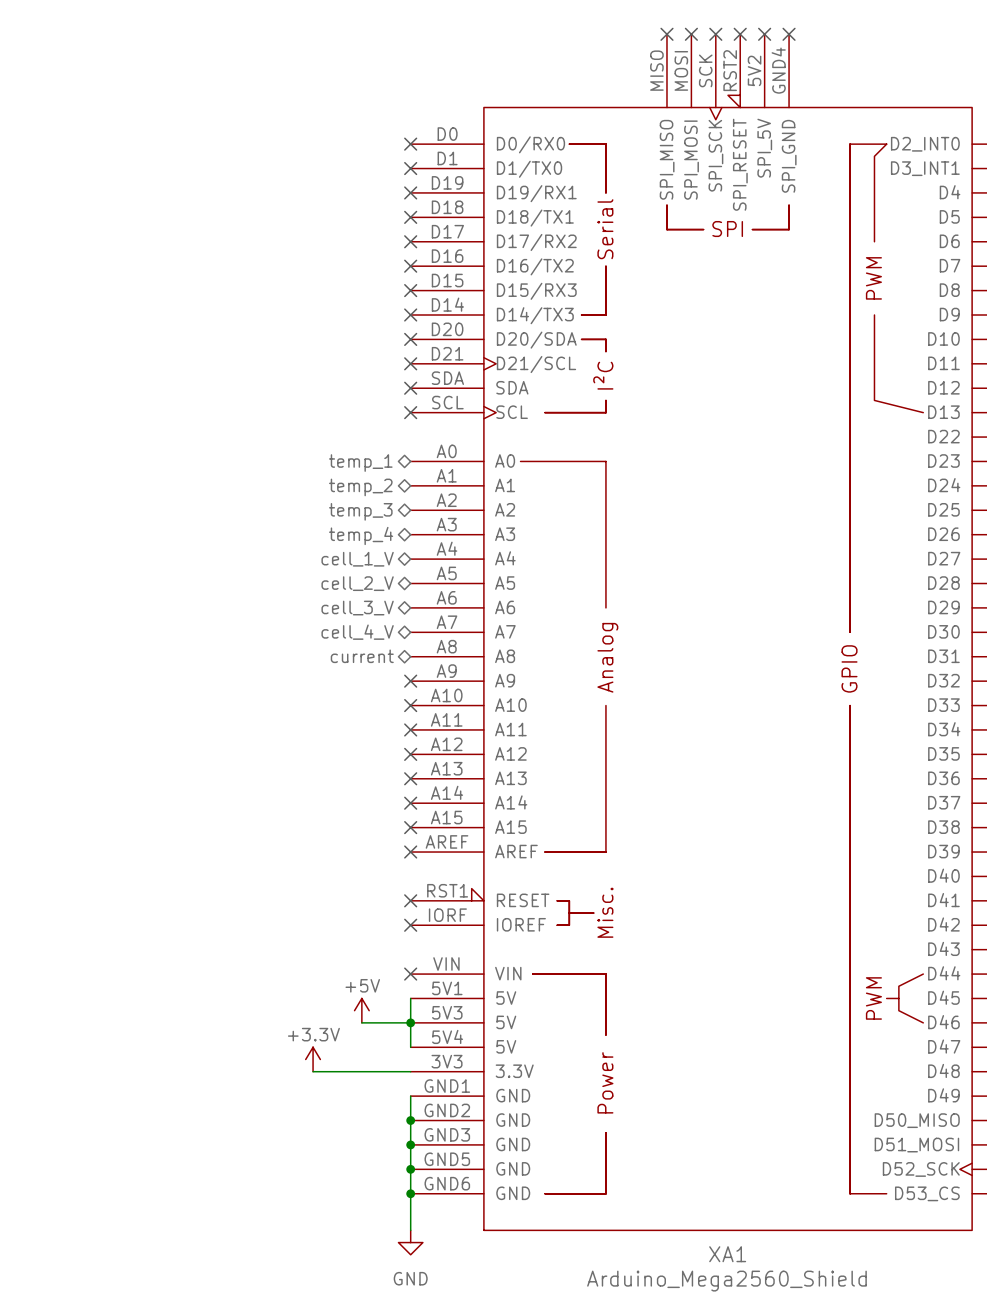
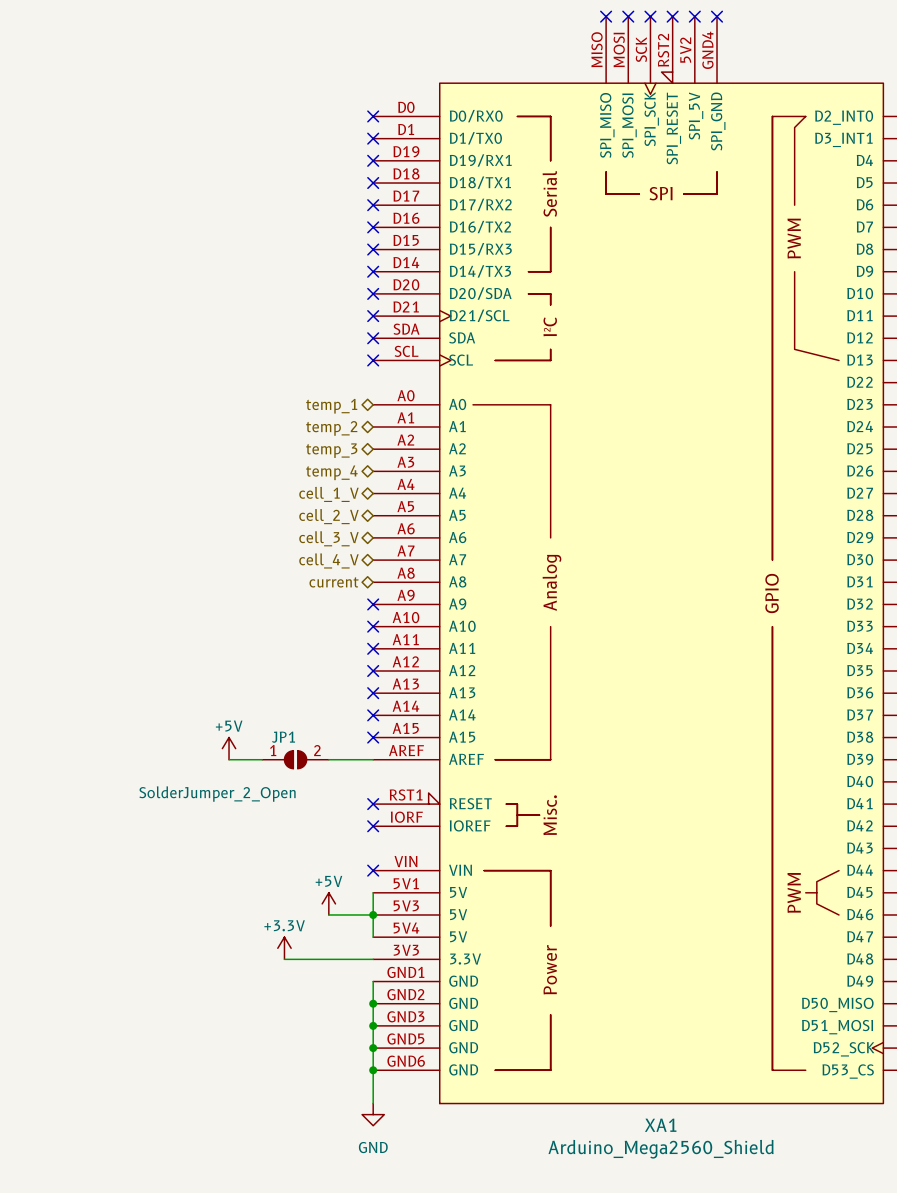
power symbol: none -> +5V (229, 748)
wire: none -> (229, 759) (262, 759)
JP1: none -> SolderJumper_2_Open (295, 759)
wire: none -> (328, 759) (373, 759)
no-connect mark: (410, 852) -> none

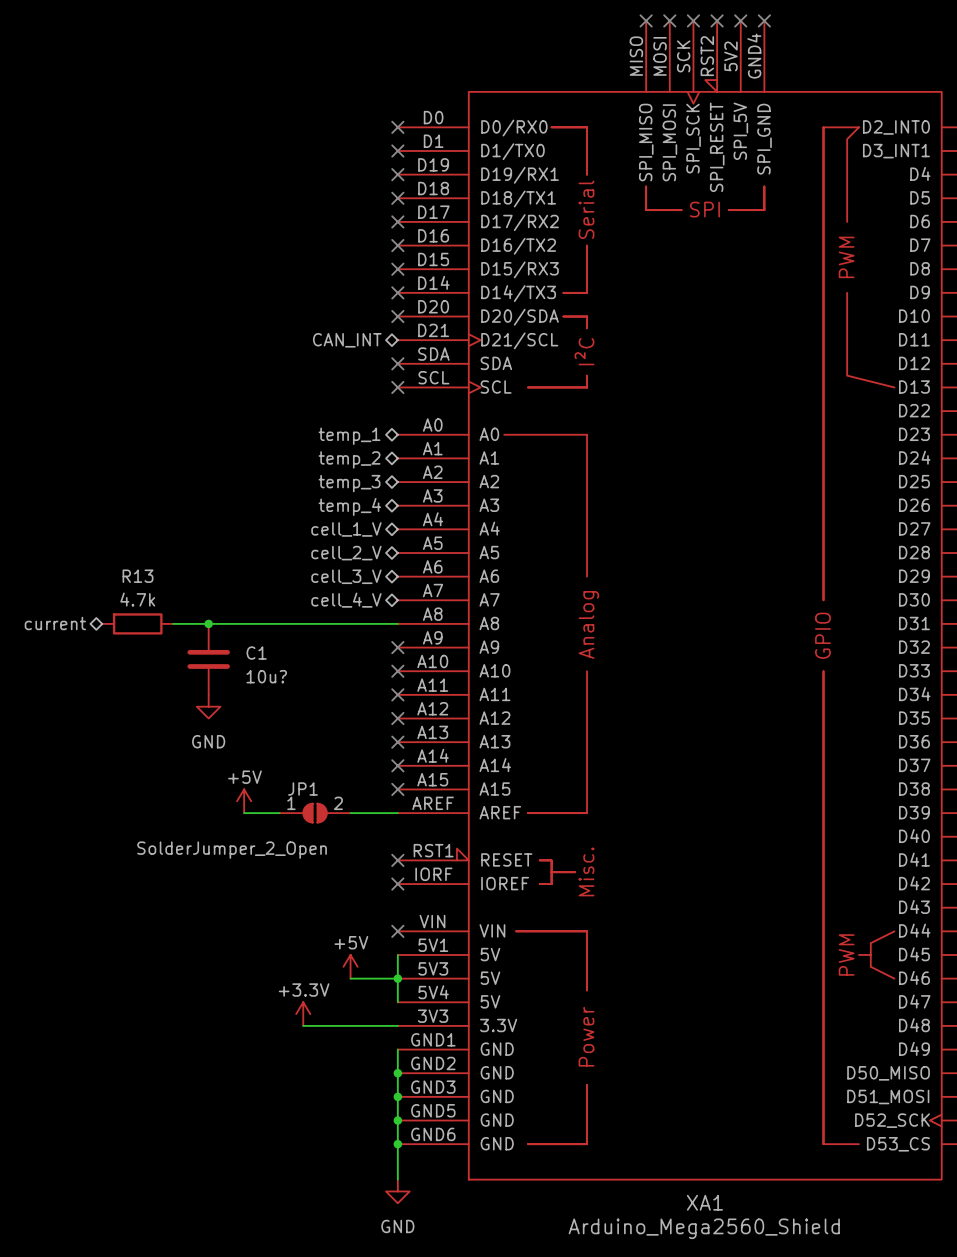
no-connect mark: (373, 316) -> none
hierarchical label: none -> CAN_INT (347, 340)
hierarchical label: none -> current (55, 623)
R13: none -> 4.7k (137, 623)
wire: none -> (173, 623) (397, 623)
junction: none -> (208, 623)
hierarchical label: current (334, 582) -> none
C1: none -> 10u? (208, 659)
power symbol: none -> GND (208, 706)

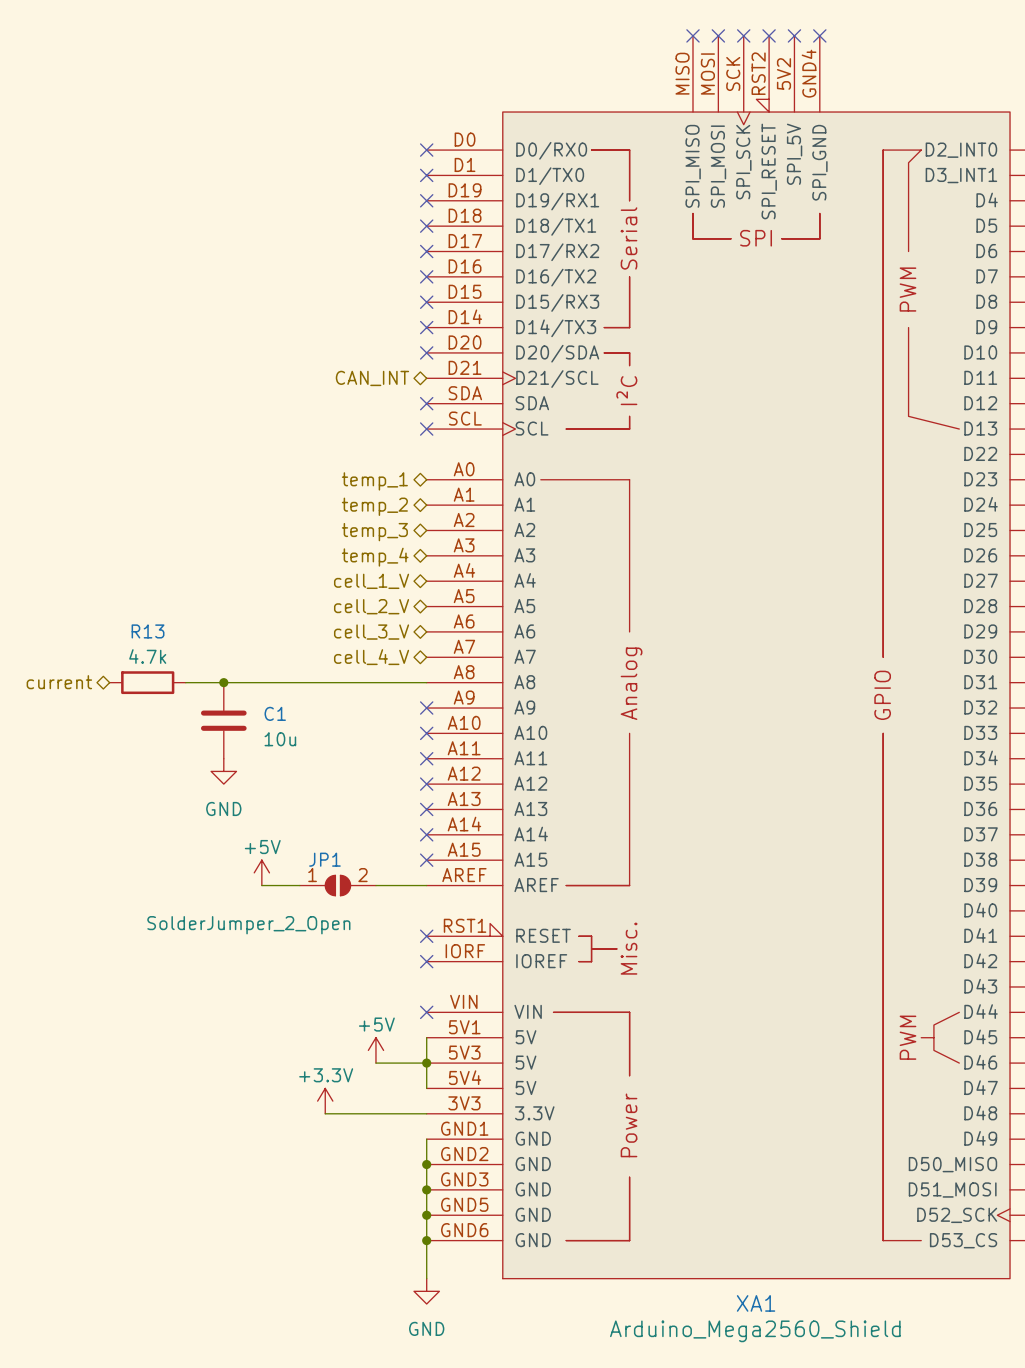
C1 value: 10u? (266, 676) -> 10u (280, 739)

